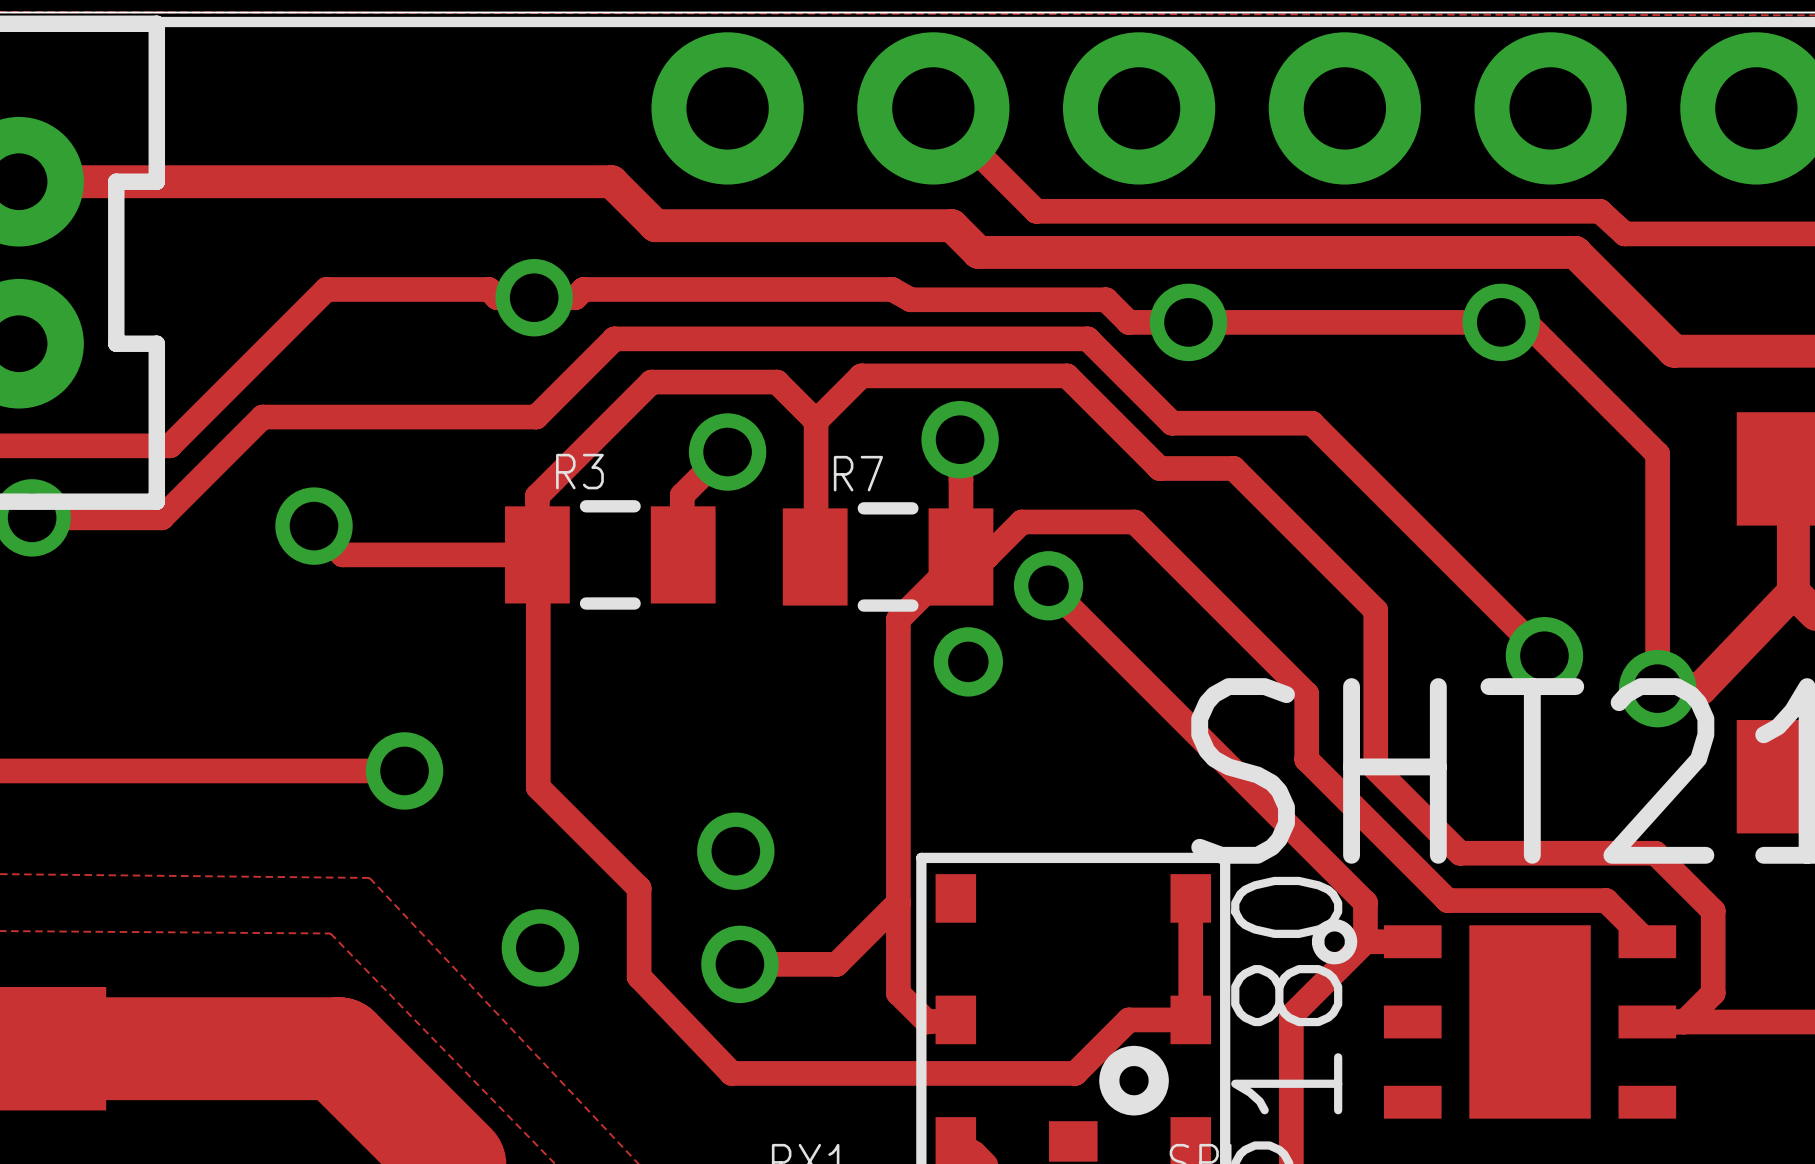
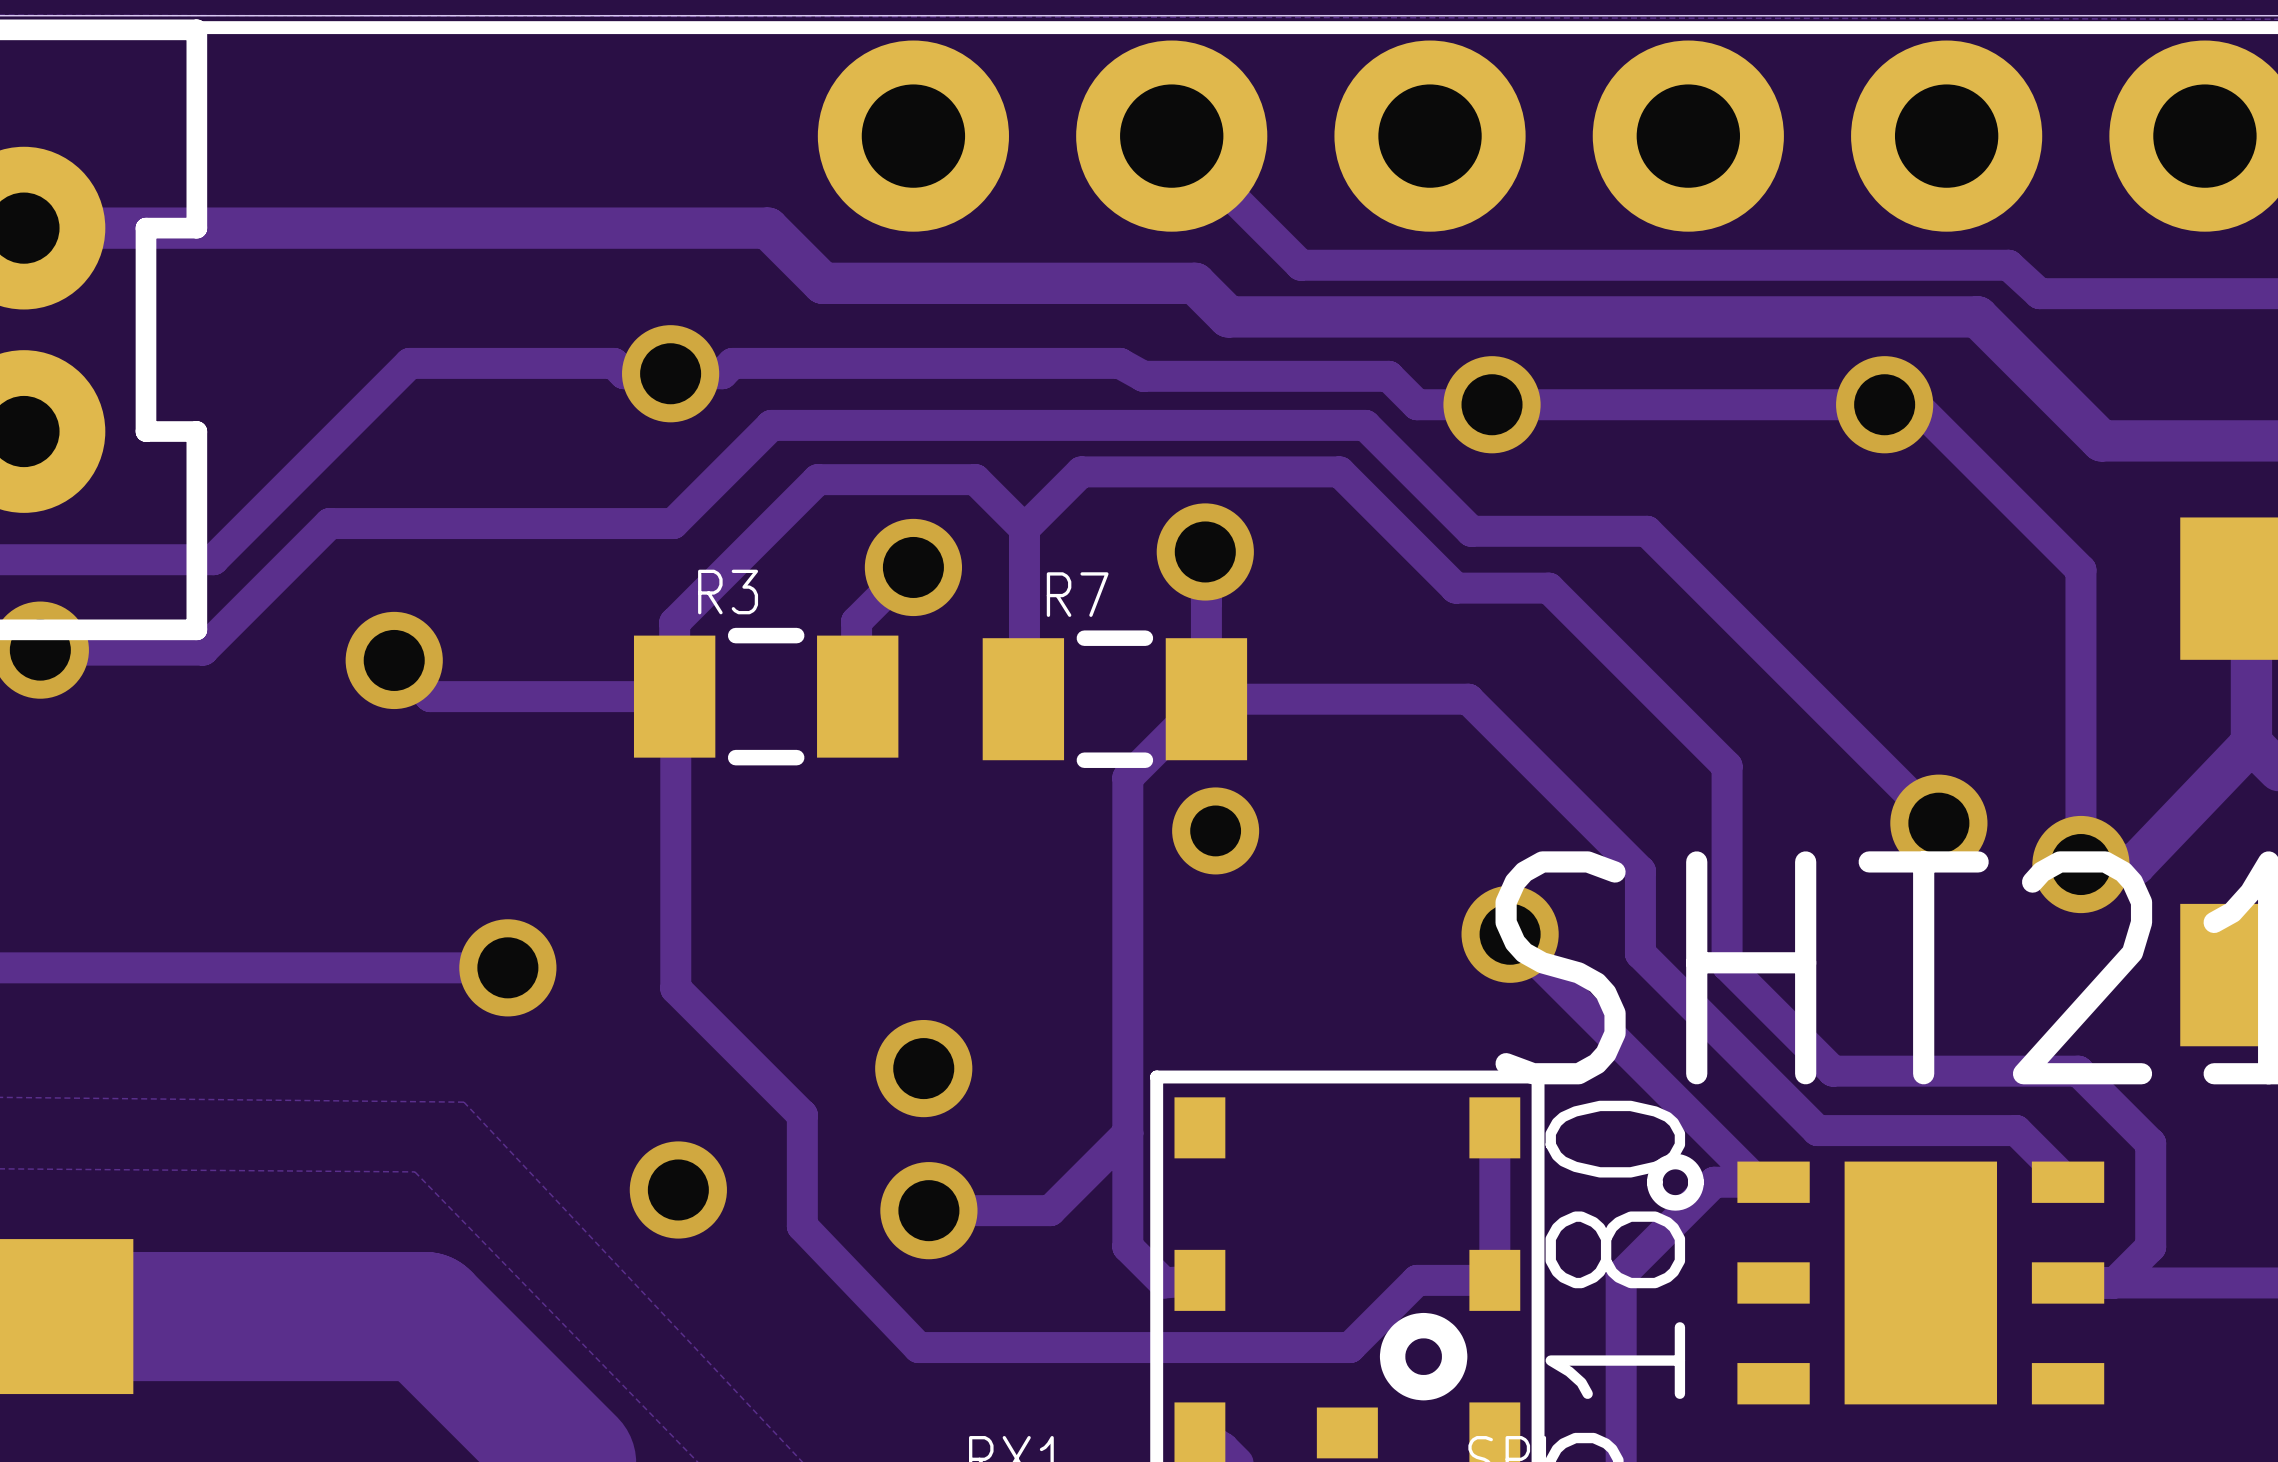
track: (986, 556) (1021, 521) (1134, 521) (1169, 556) -> (1238, 699) (1468, 699)
track: (1048, 585) (1365, 902) (1365, 941) -> none
via: (1048, 585) -> none
track: none -> (1510, 934) (1758, 1182)
via: none -> (1510, 934)

